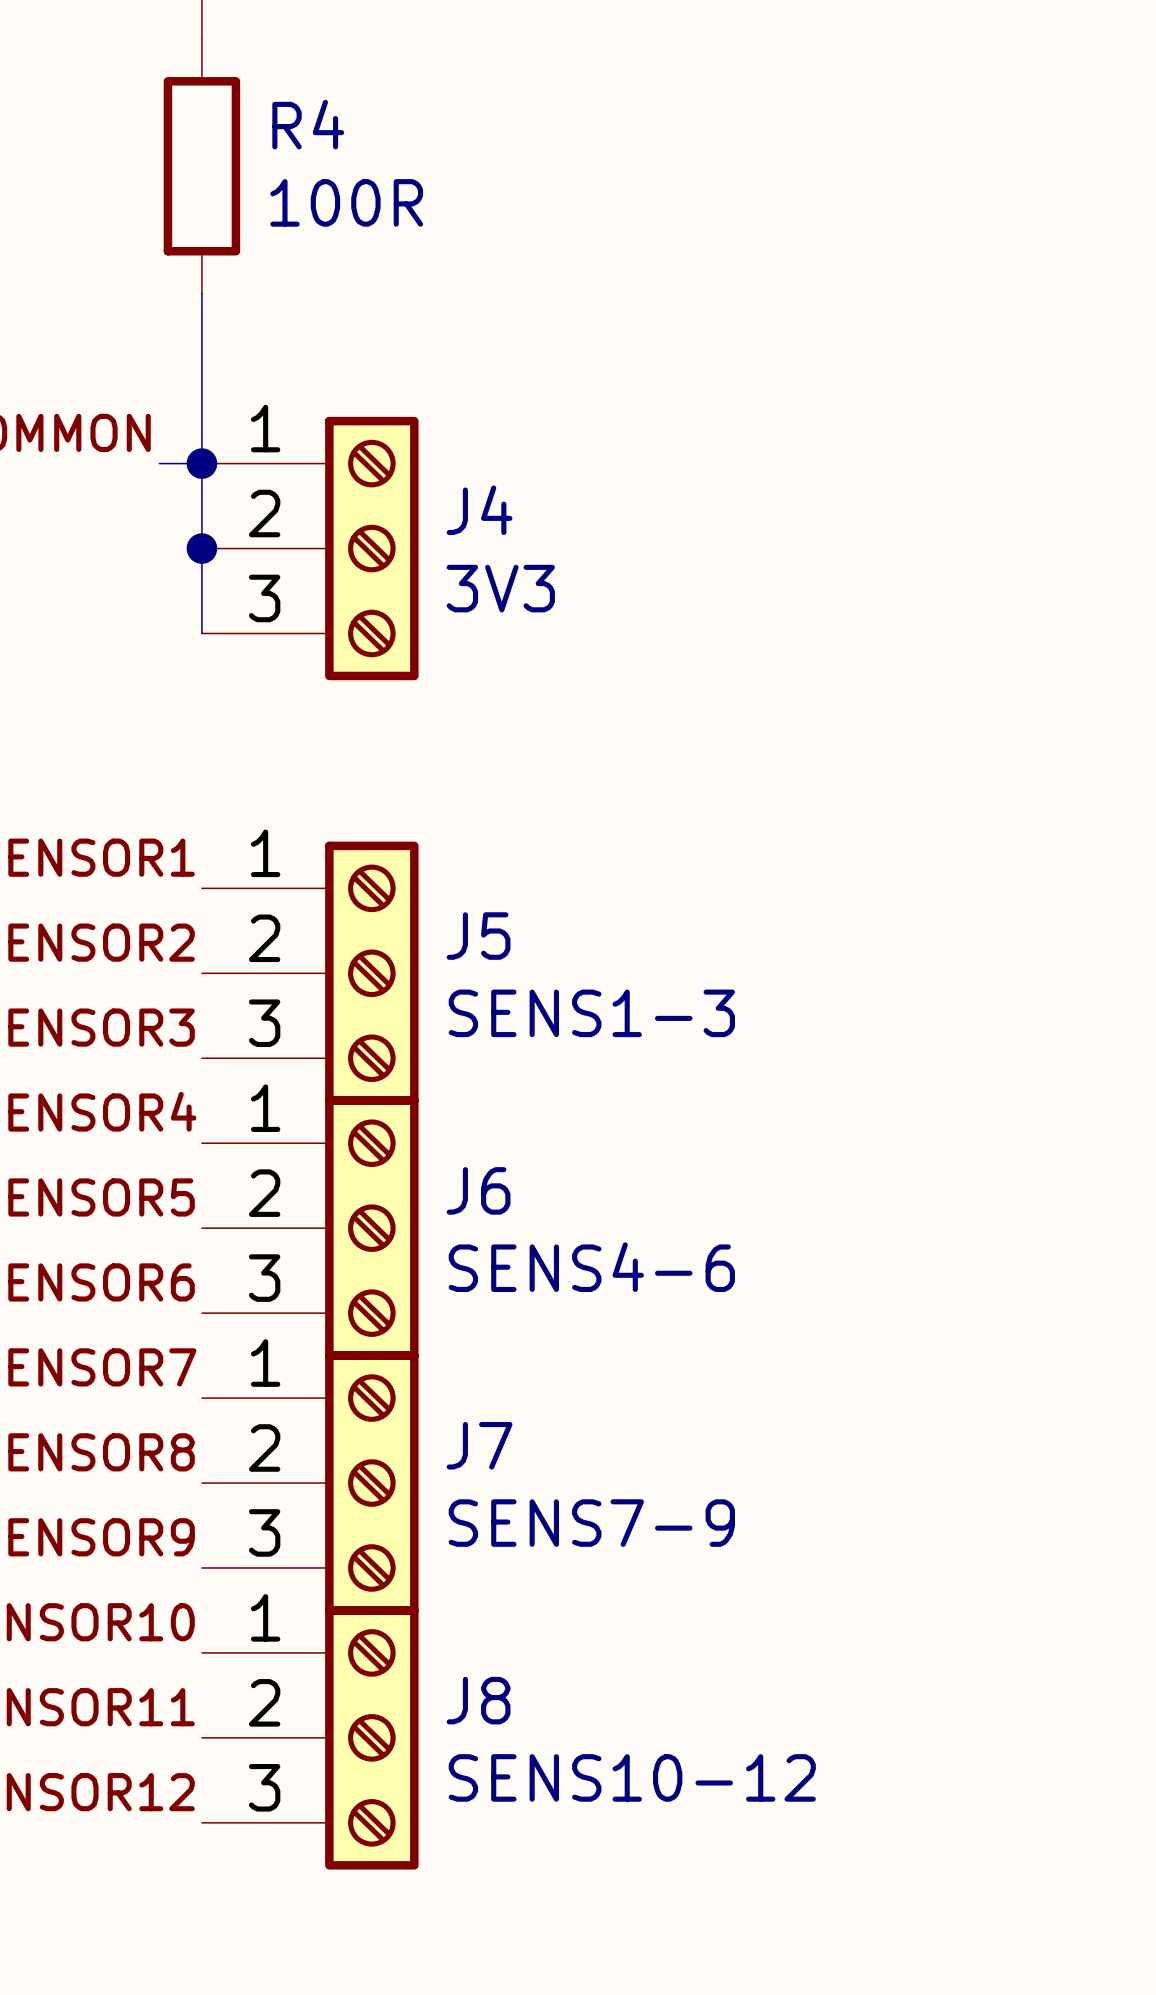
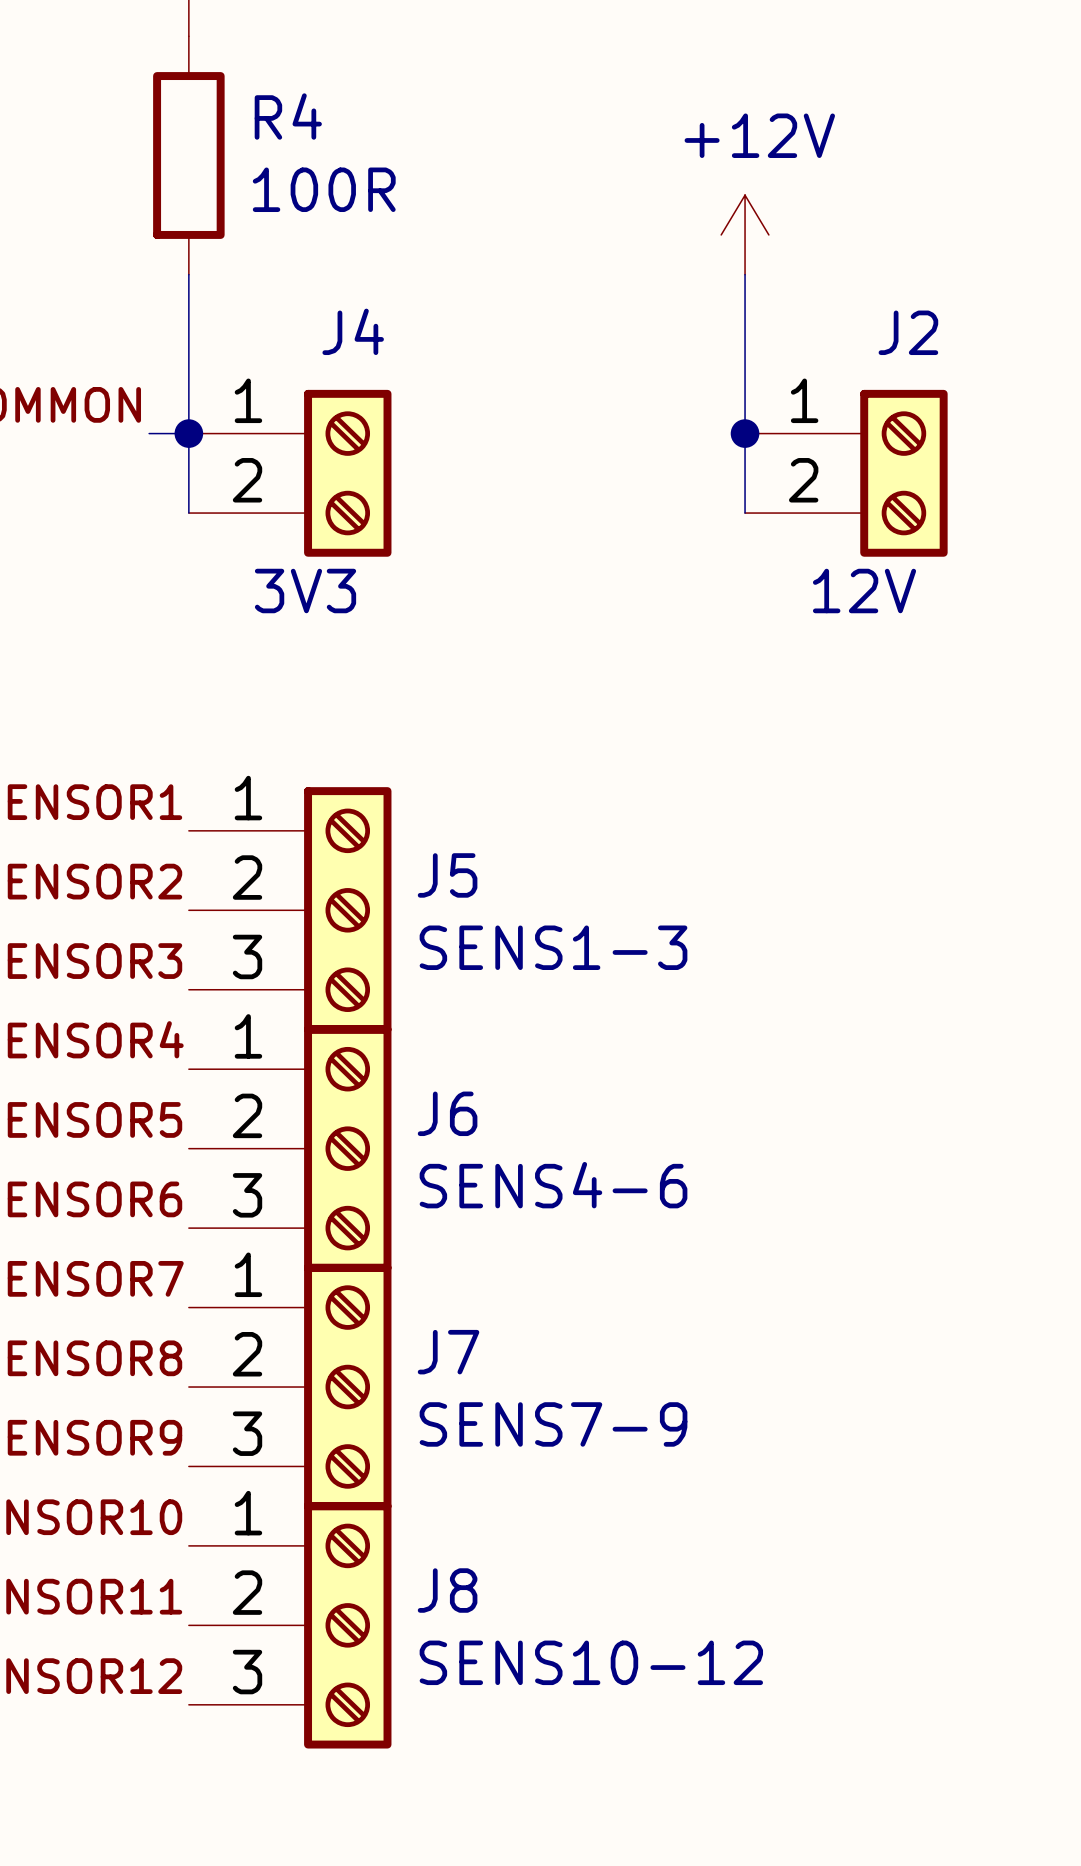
power symbol: none -> +12V (745, 234)
wire: none -> (745, 274) (745, 513)
J4 symbol: [201, 416, 419, 681] -> [188, 389, 392, 557]
junction: none -> (745, 433)
J2: none -> 12V (846, 473)
J4 name position: J4 (479, 510) -> J4 (353, 331)
wire: (201, 548) (201, 633) -> none
junction: (201, 548) -> none
J4 value position: 3V3 (500, 588) -> 3V3 (305, 591)

